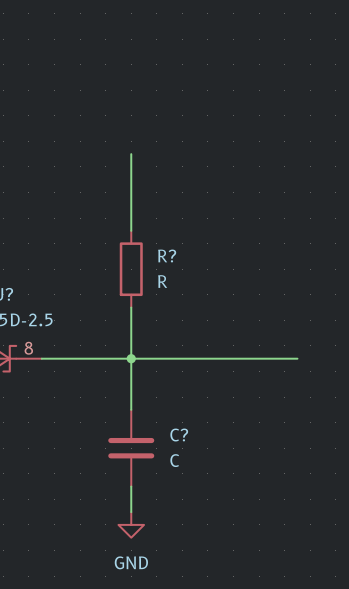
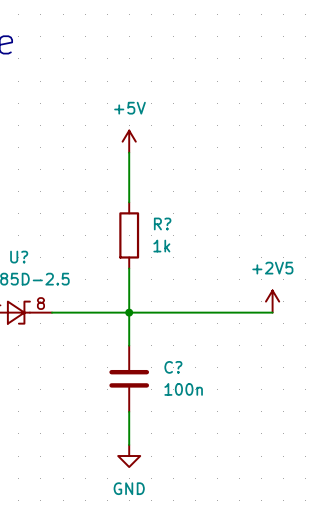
power symbol: none -> +5V (129, 141)
R? value: R (162, 281) -> 1k (161, 246)
power symbol: none -> +2V5 (272, 301)
C?: none -> 100n (129, 378)
C?: C (131, 448) -> none

